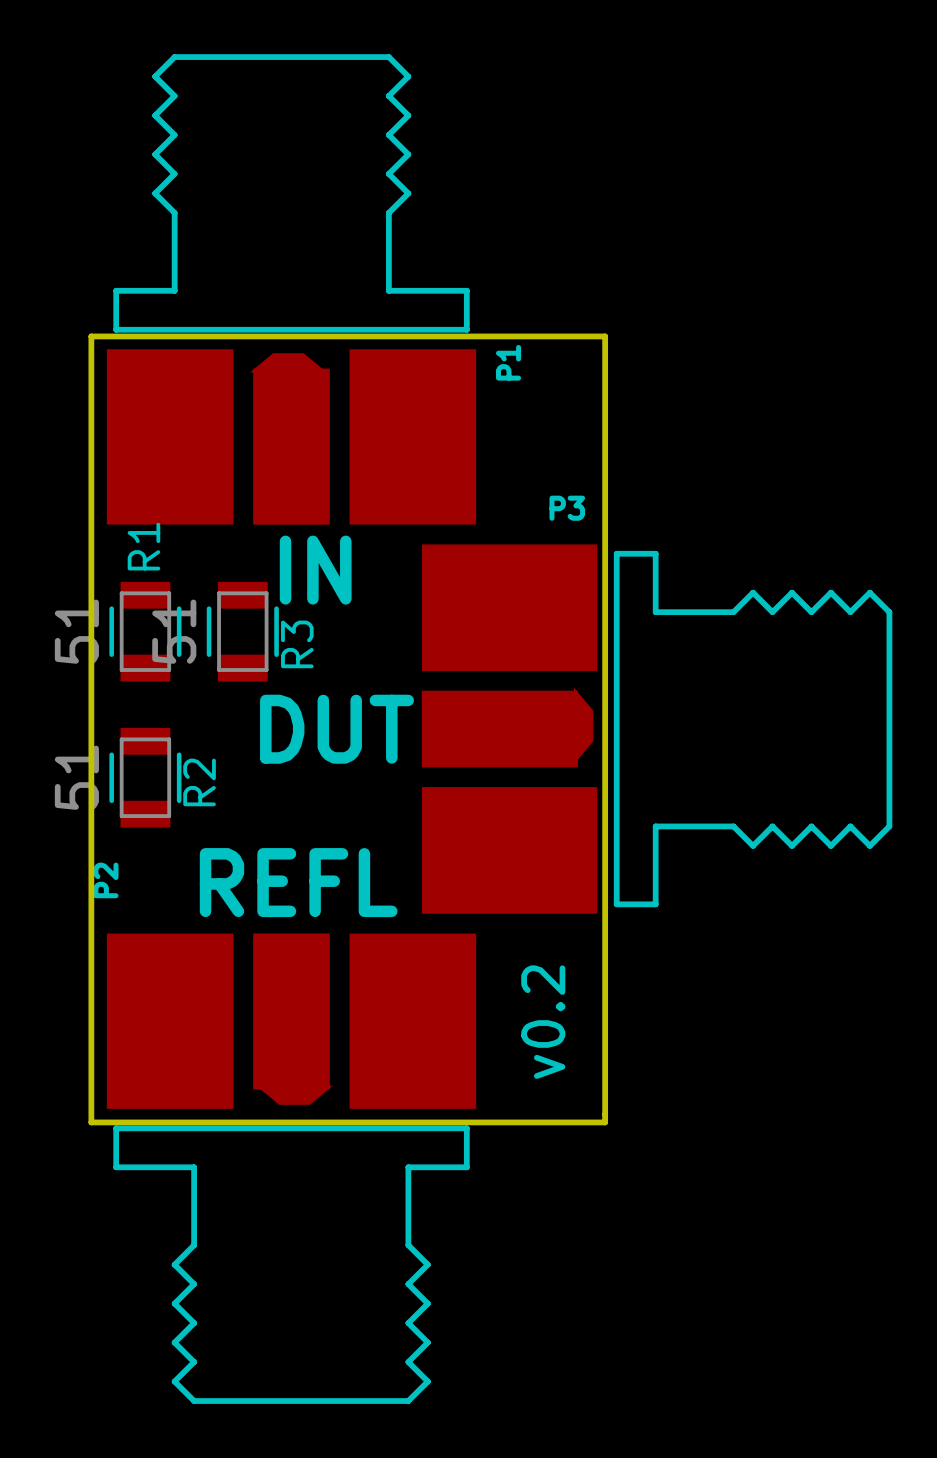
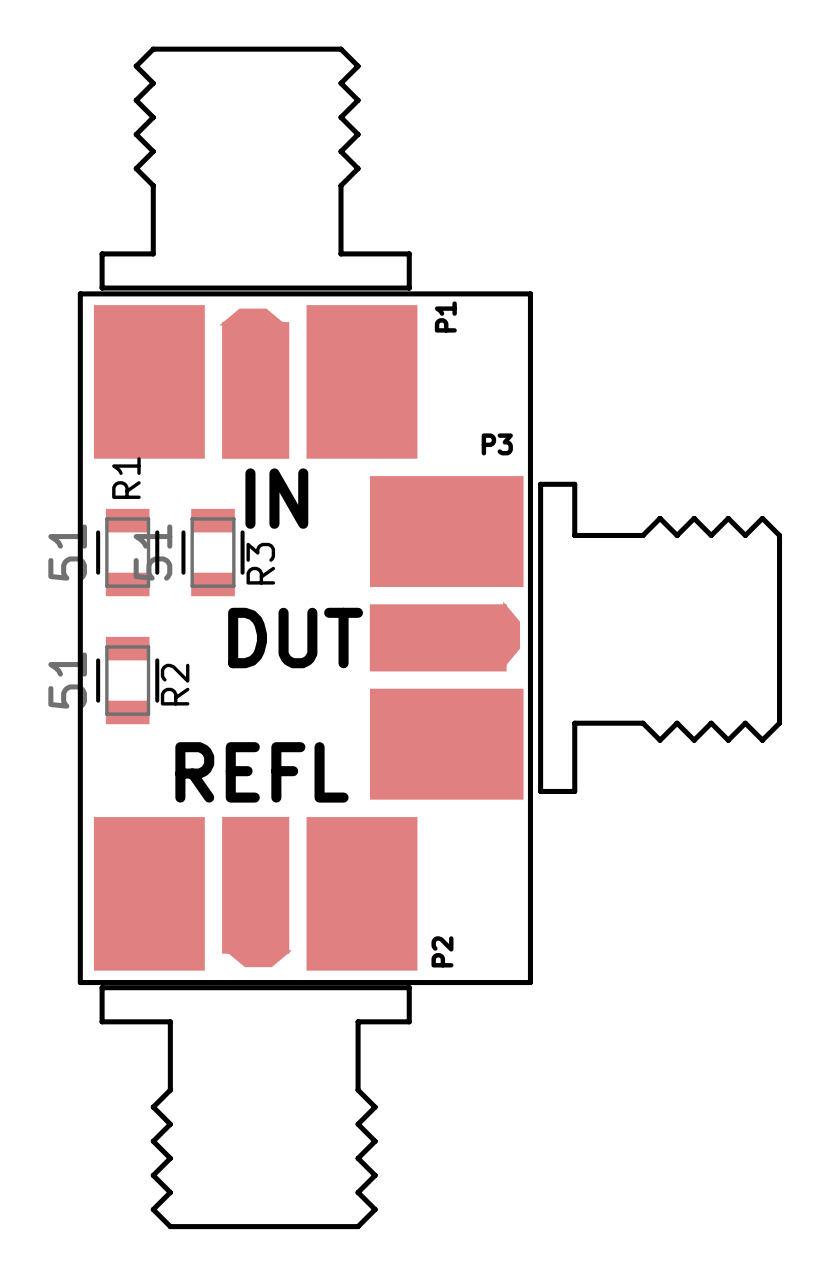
P2 name position: P2 (105, 880) -> P2 (442, 951)
text: v0.2 (543, 1022) -> none

